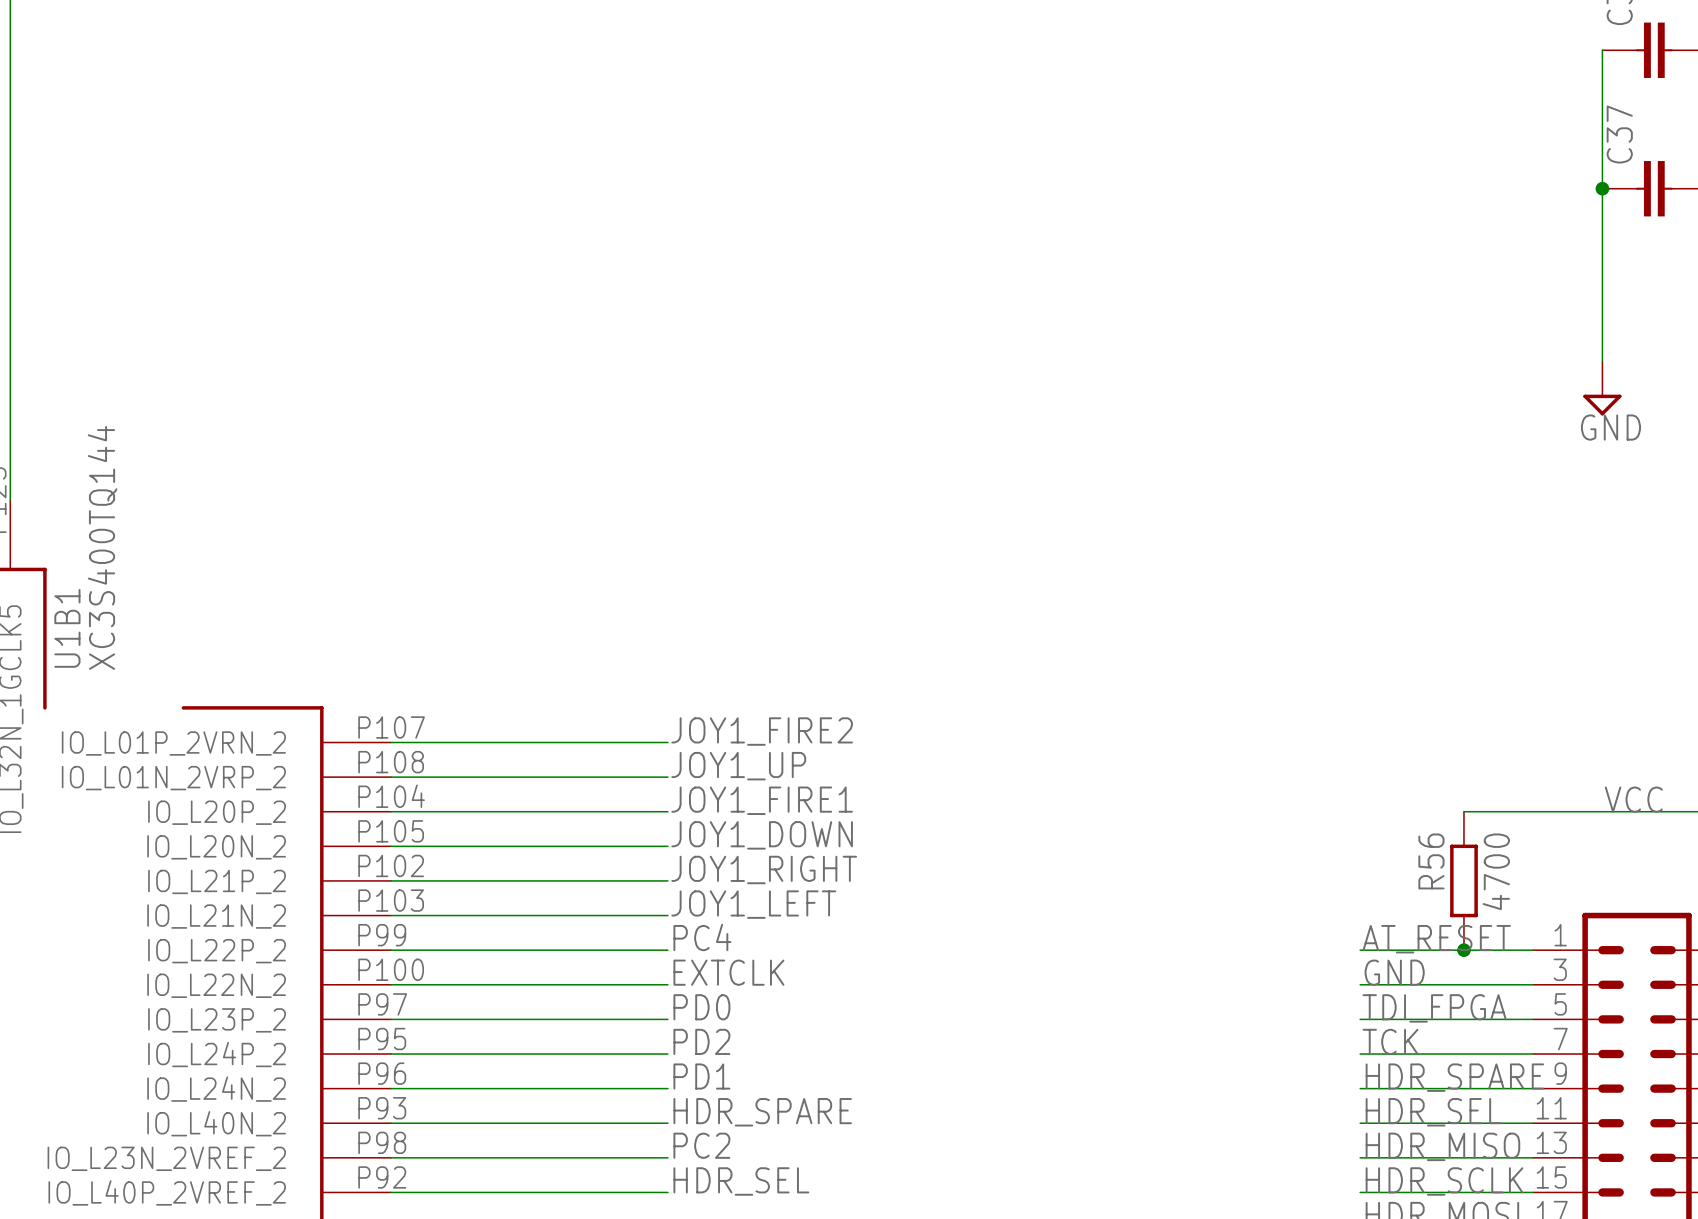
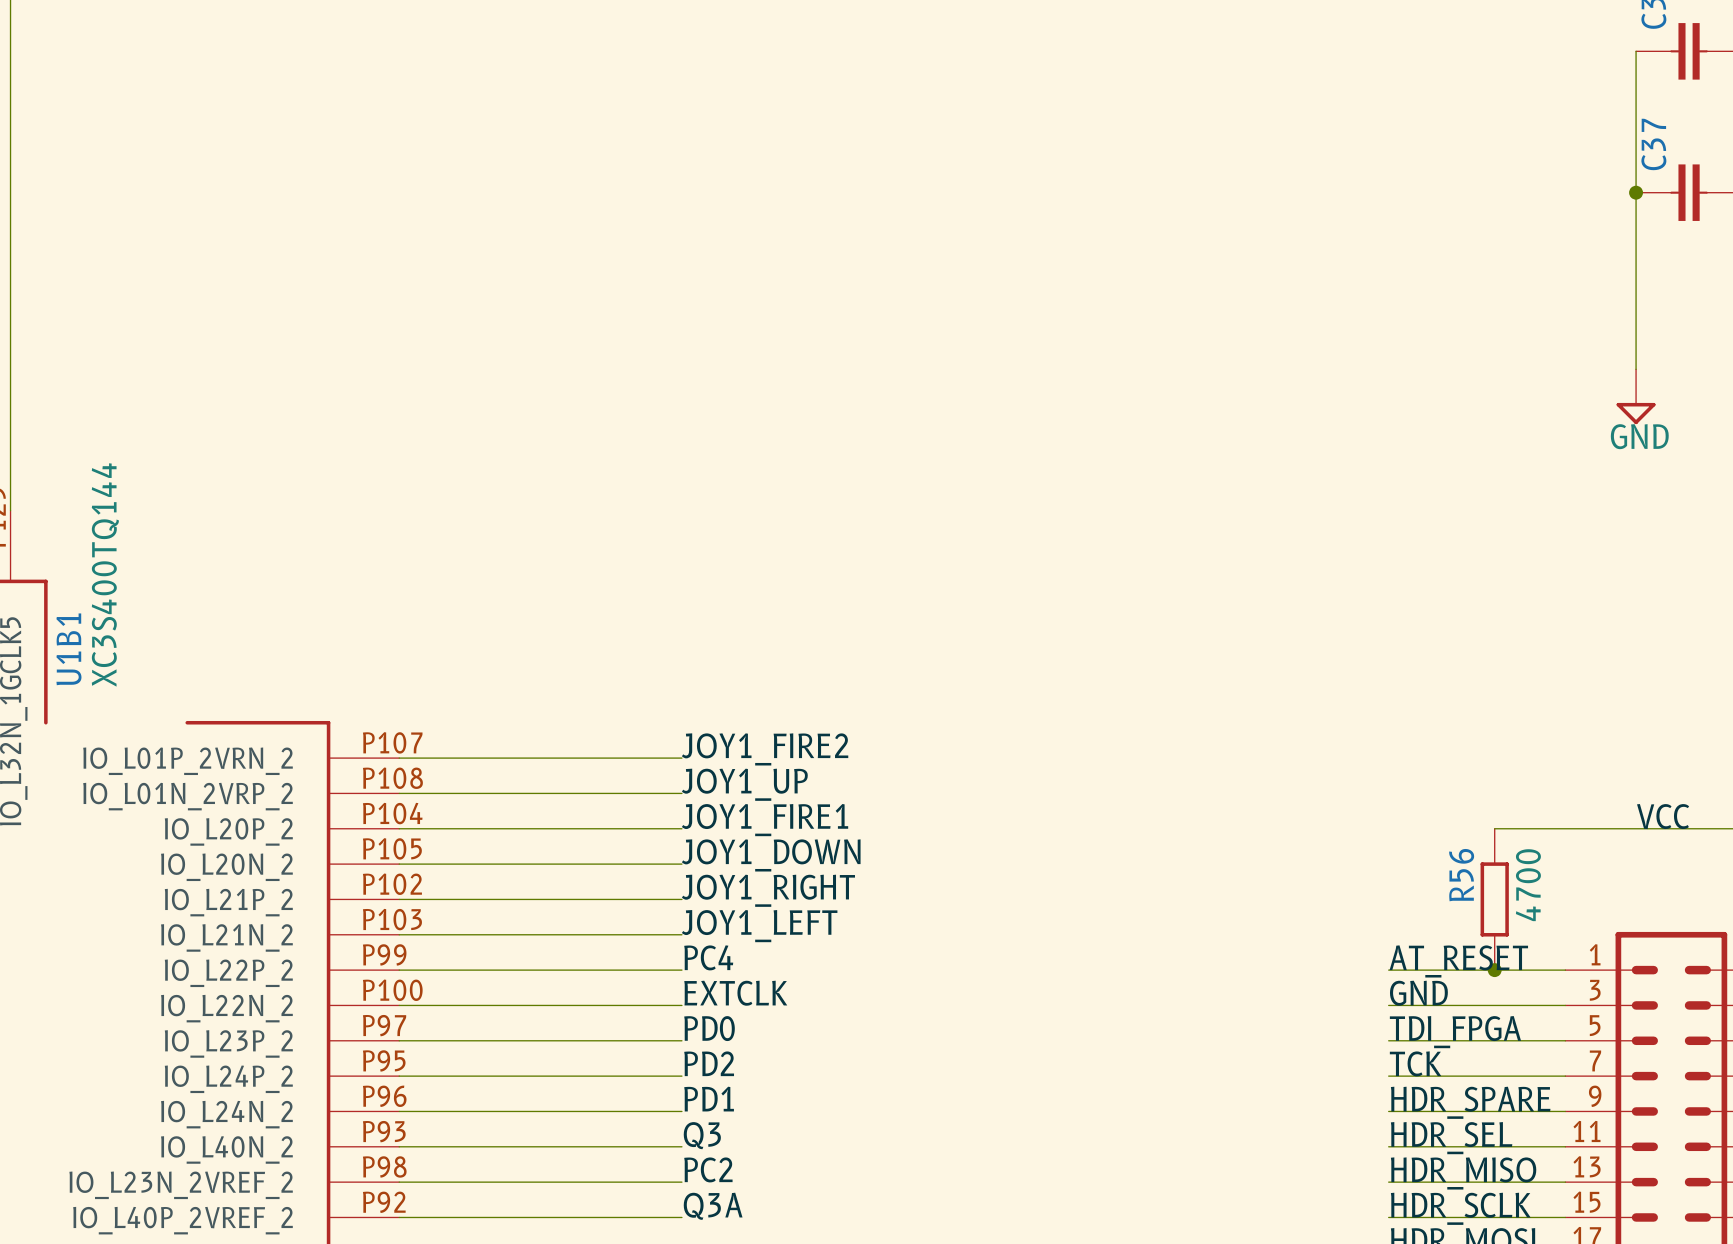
label: HDR_SPARE (762, 1112) -> Q3 (702, 1135)
label: HDR_SEL (741, 1181) -> Q3A (713, 1206)

